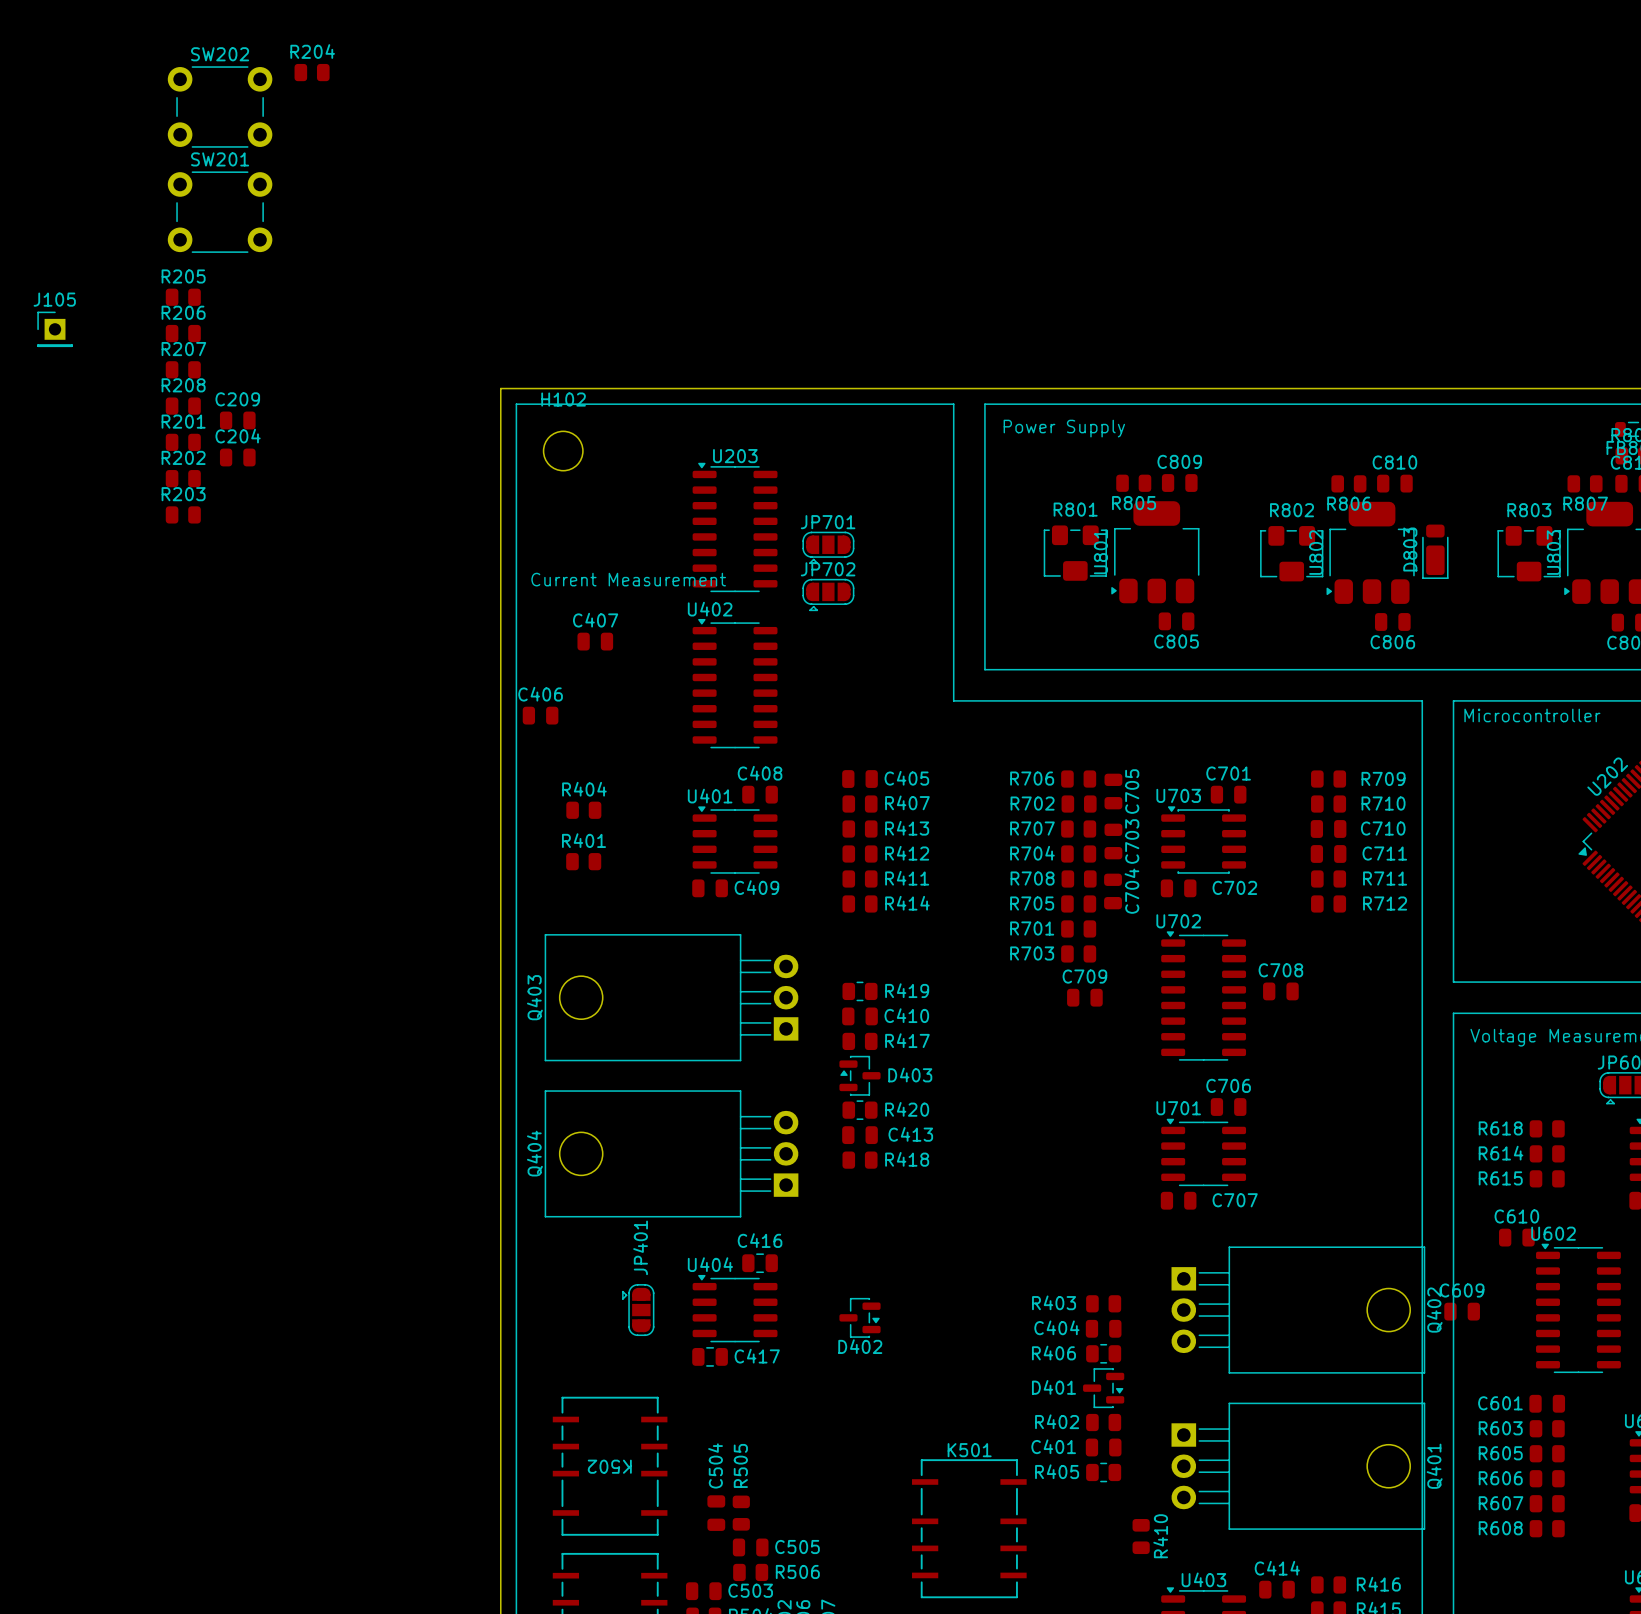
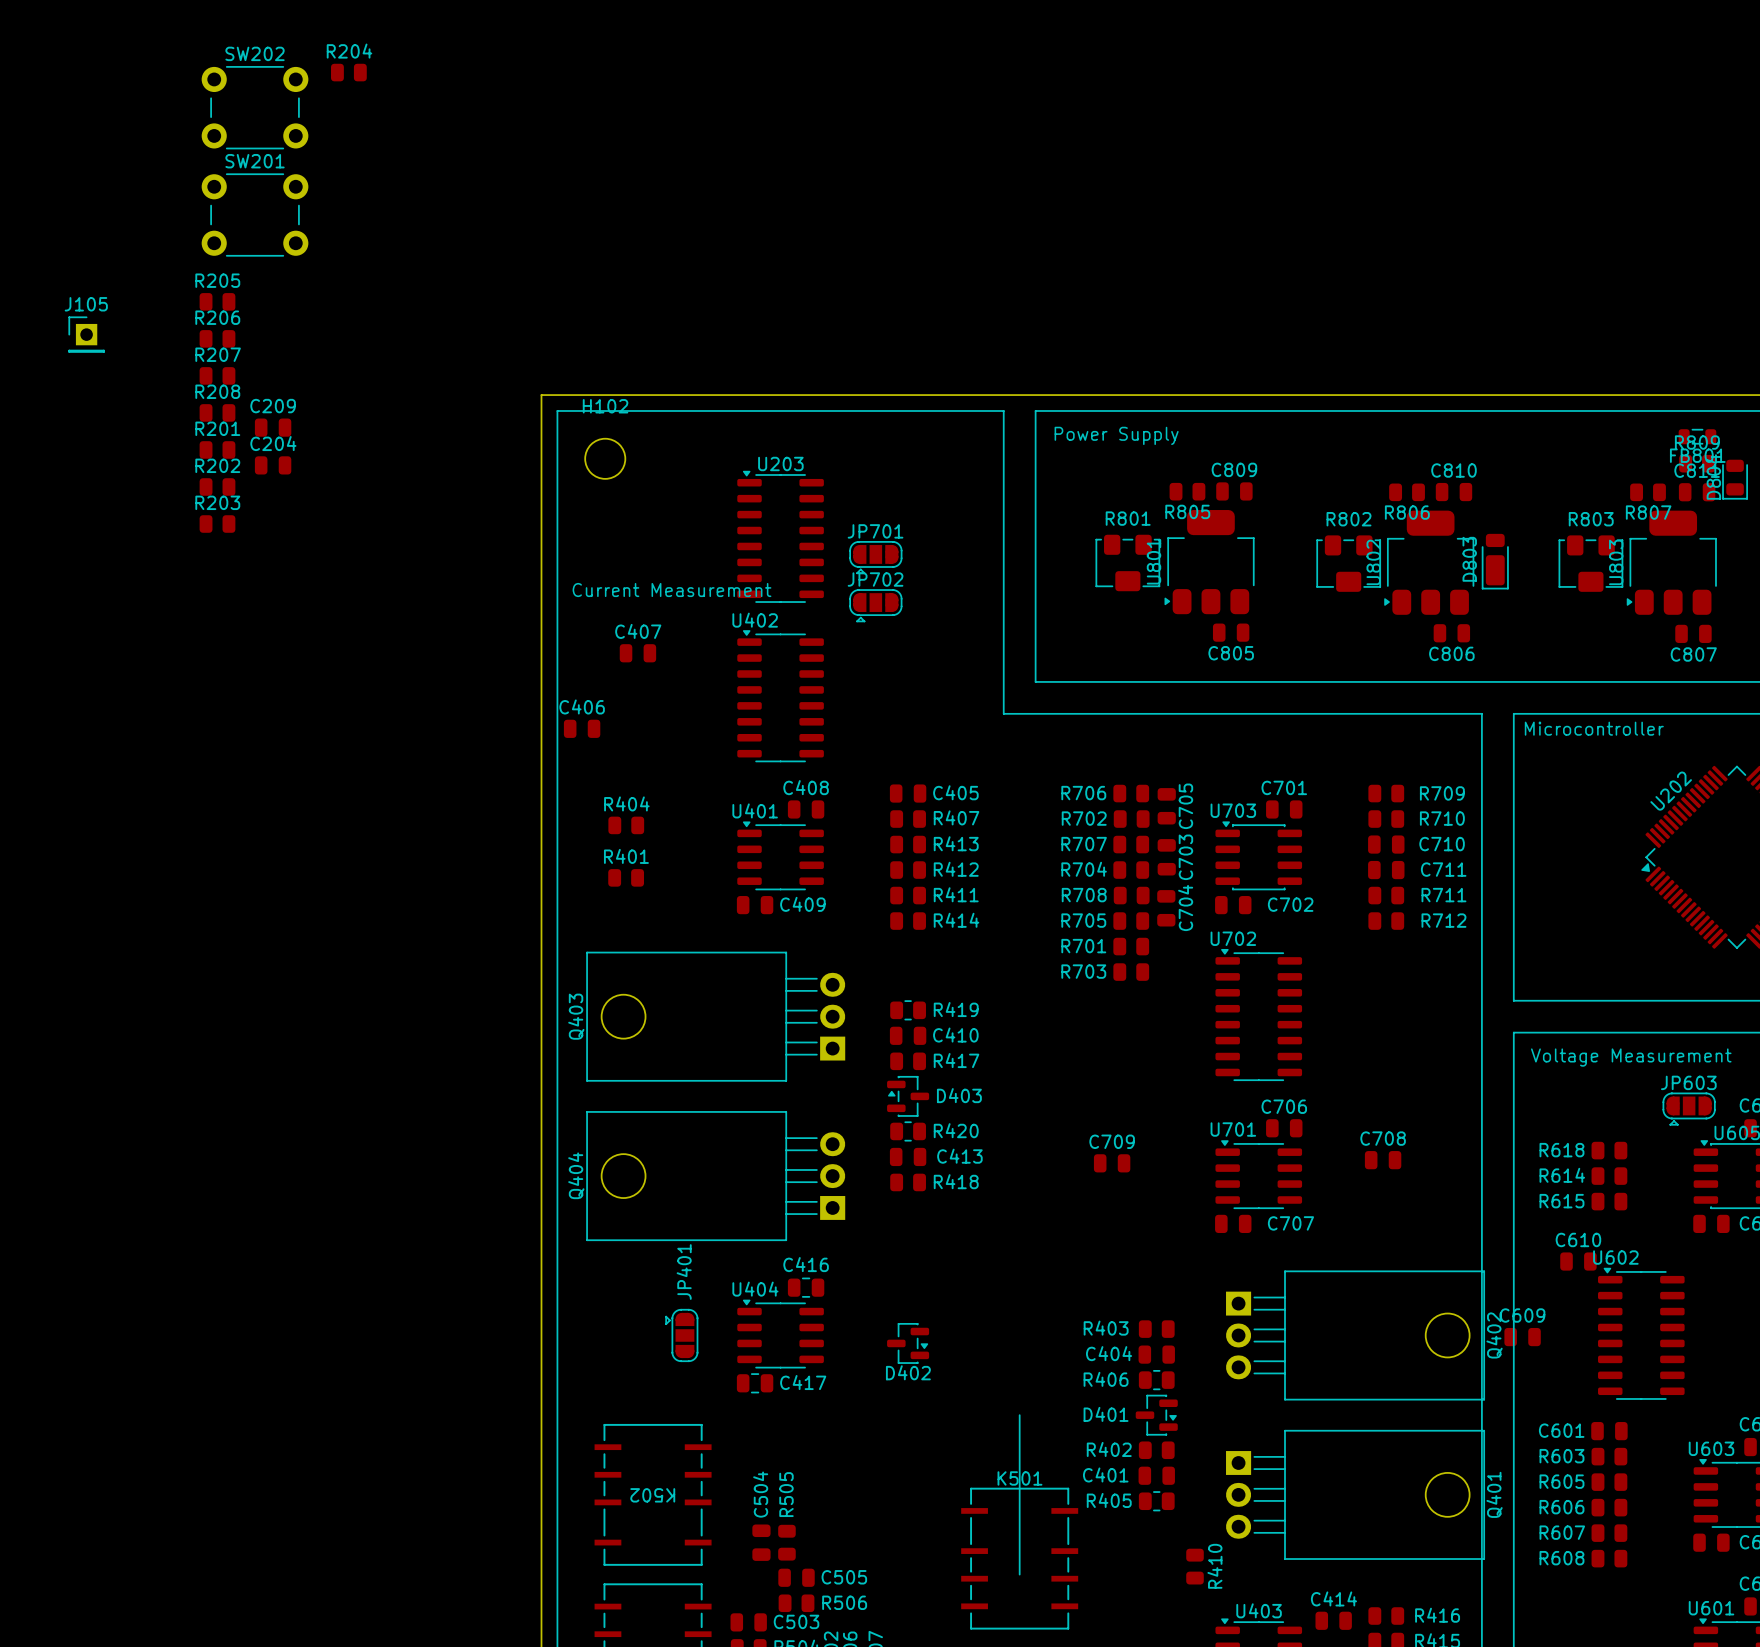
C708 position: (1280, 991) -> (1383, 1160)
C709 position: (1084, 997) -> (1112, 1163)
line: none -> (1019, 1415) (1019, 1574)

